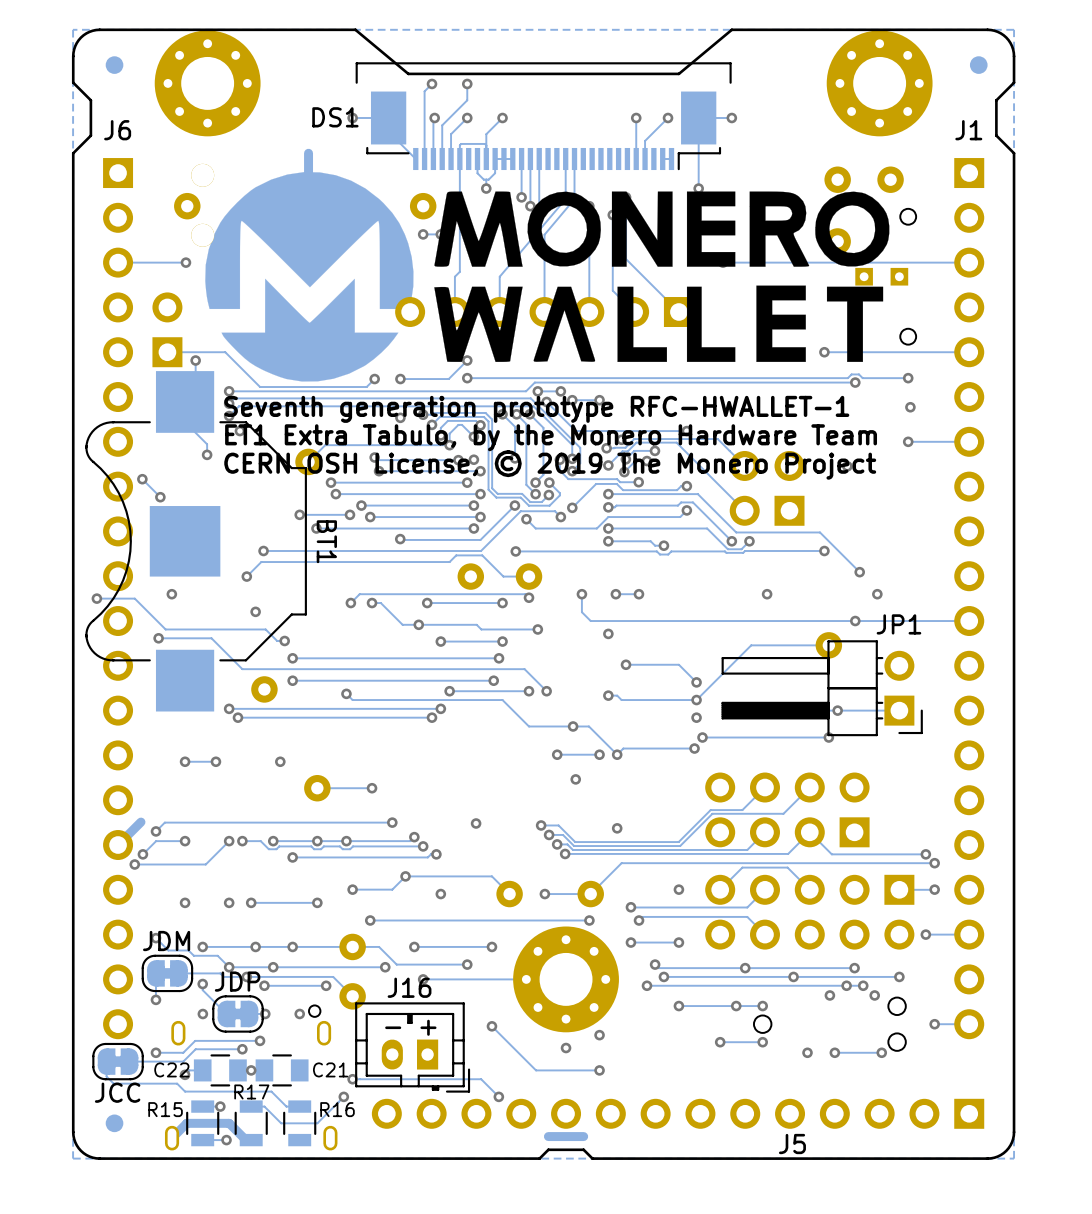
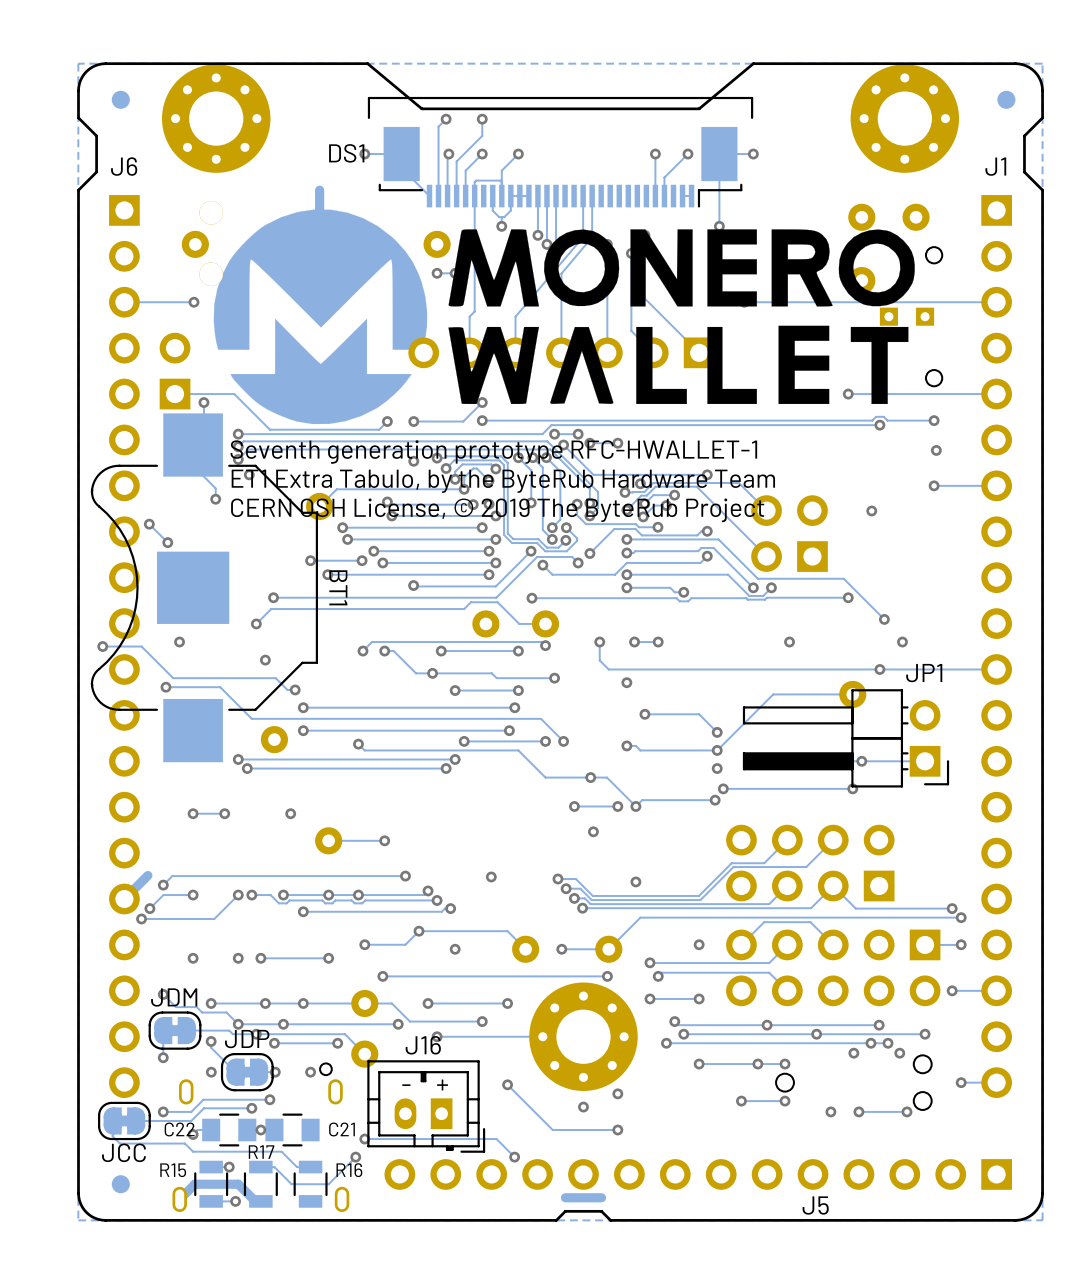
text: ET1 Extra Tabulo, by the Monero Hardware Team (551, 437) -> ET1 Extra Tabulo, by the ByteRub Hardware Team (503, 481)
text: CERN OSH License, © 2019 The Monero Project (550, 464) -> CERN OSH License, © 2019 The ByteRub Project (497, 510)

